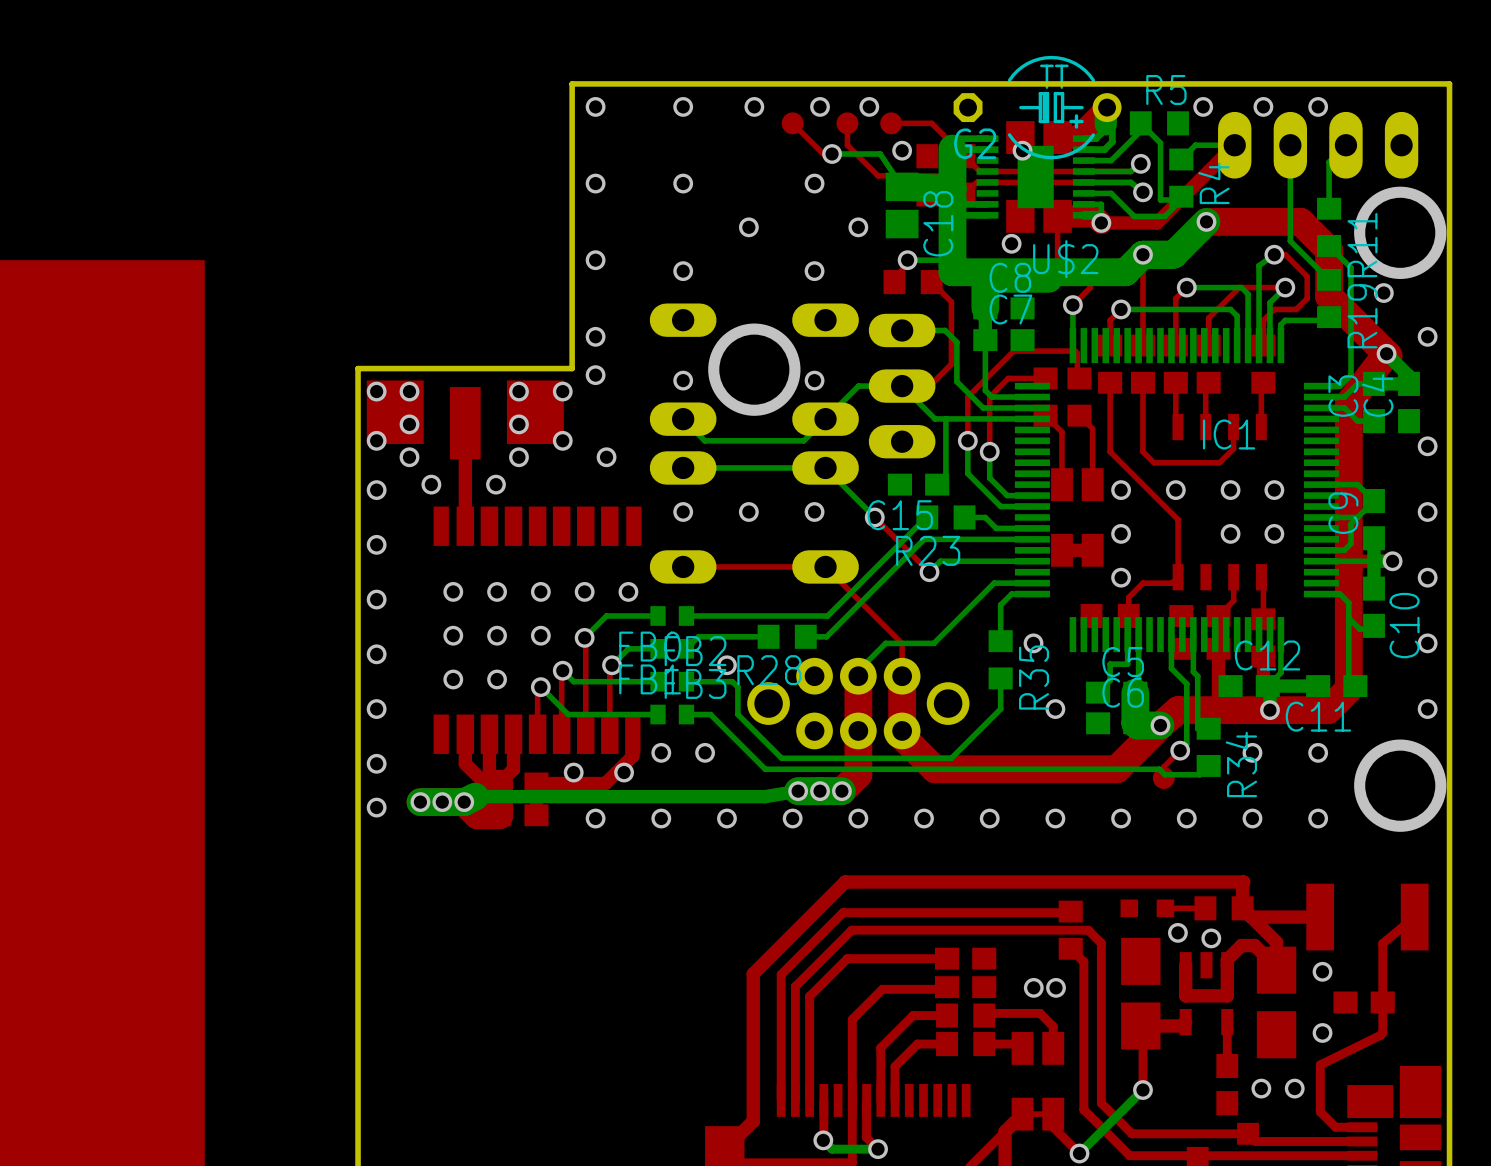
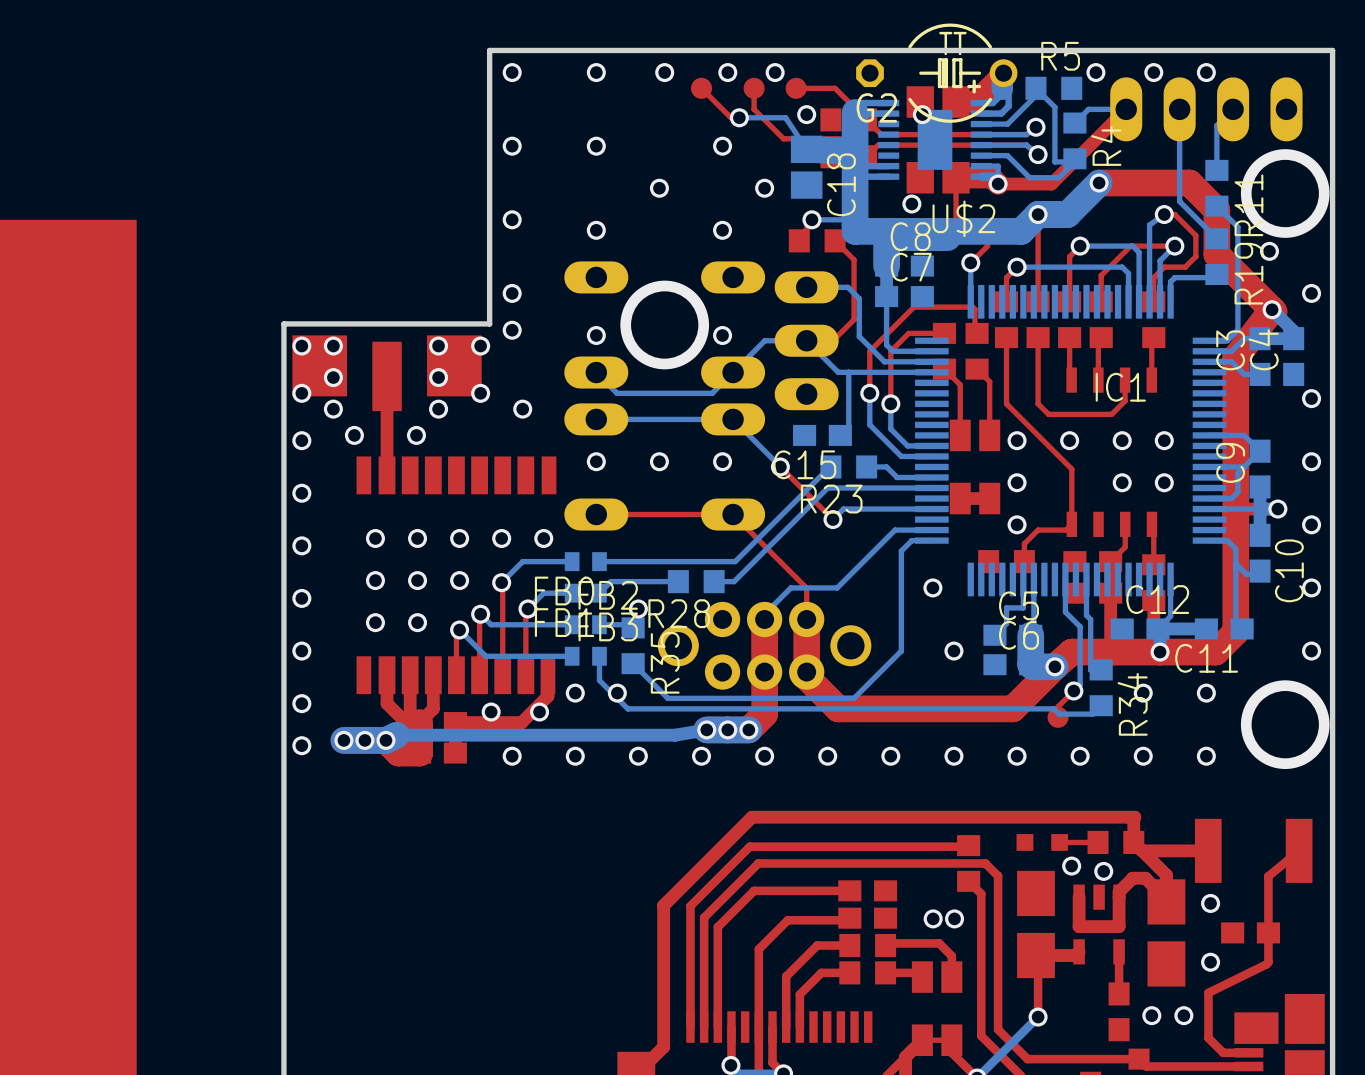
bottom track: none -> (901, 585) (901, 621)
R35 position: (1000, 659) -> (633, 645)
bottom track: (721, 681) (732, 681) (737, 687) (737, 714) (781, 758) -> (633, 663) (667, 698) (690, 698)
bottom track: (686, 714) (710, 714) (765, 769) -> (599, 656) (599, 680) (627, 708) (675, 708)

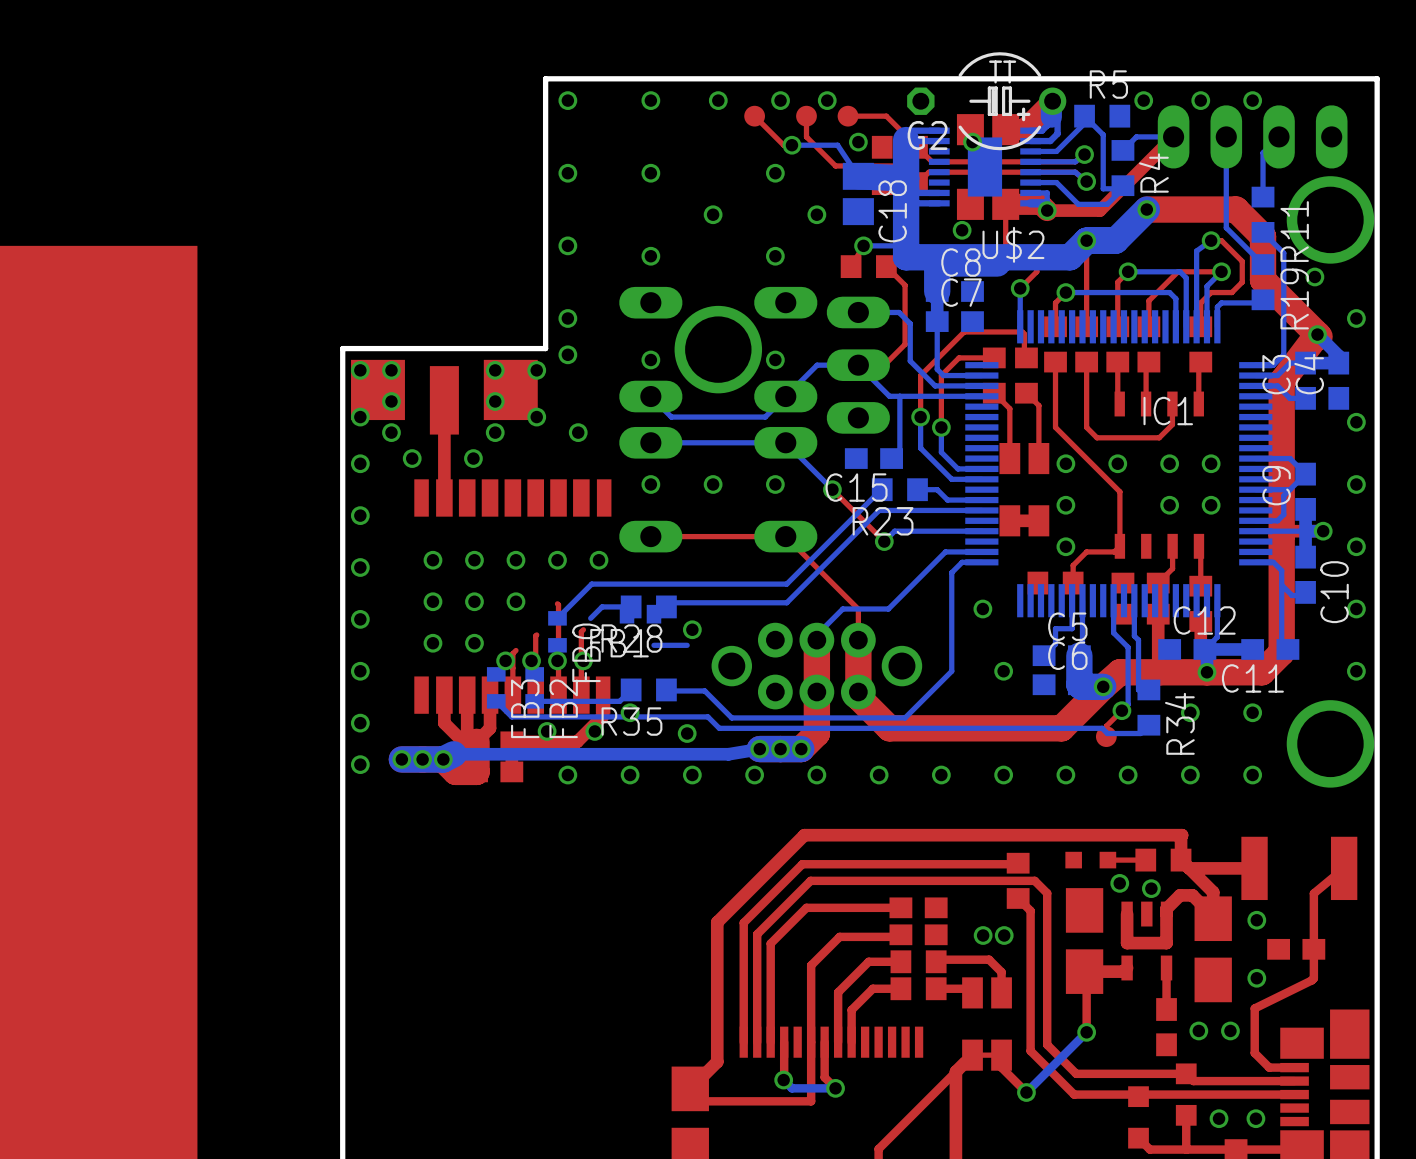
bottom track: (572, 561) (522, 561) (501, 582) -> none
FB0 rotation: 0° (585, 561) -> 90° clockwise (557, 631)
FB0 position: (585, 561) -> (557, 631)
bottom track: (735, 561) (599, 561) -> (787, 583) (591, 584) (557, 618)
R28 position: (696, 581) -> (648, 606)
bottom track: none -> (767, 602) (731, 602)
via: (501, 582) -> none
bottom track: none -> (631, 606) (602, 606) (590, 618)
FB0 name position: FB0 (564, 591) -> FB0 (586, 652)
bottom track: (572, 593) (543, 593) (527, 608) -> none
via: (527, 608) -> none
bottom track: (480, 614) (491, 624) (572, 624) -> none
via: (480, 614) -> none
FB2 rotation: 0° (585, 624) -> 90° clockwise (534, 687)
FB2 position: (585, 624) -> (534, 687)
bottom track: (459, 630) (485, 656) (572, 656) -> none
via: (459, 630) -> none
via: none -> (505, 660)
via: none -> (531, 660)
via: none -> (557, 660)
via: none -> (583, 660)
R35 rotation: 0° (633, 645) -> 90° clockwise (648, 689)
R35 position: (633, 645) -> (648, 689)
FB3 rotation: 0° (585, 656) -> 90° clockwise (496, 687)
FB3 position: (585, 656) -> (496, 687)
bottom track: (599, 656) (599, 680) (627, 708) (665, 708) -> (496, 701) (511, 716) (707, 716) (719, 728)
bottom track: (633, 663) (667, 698) (678, 698) -> (666, 689) (704, 690) (731, 717)
bottom track: none -> (631, 689) (619, 701) (534, 701)
via position: (617, 693) -> (687, 733)

